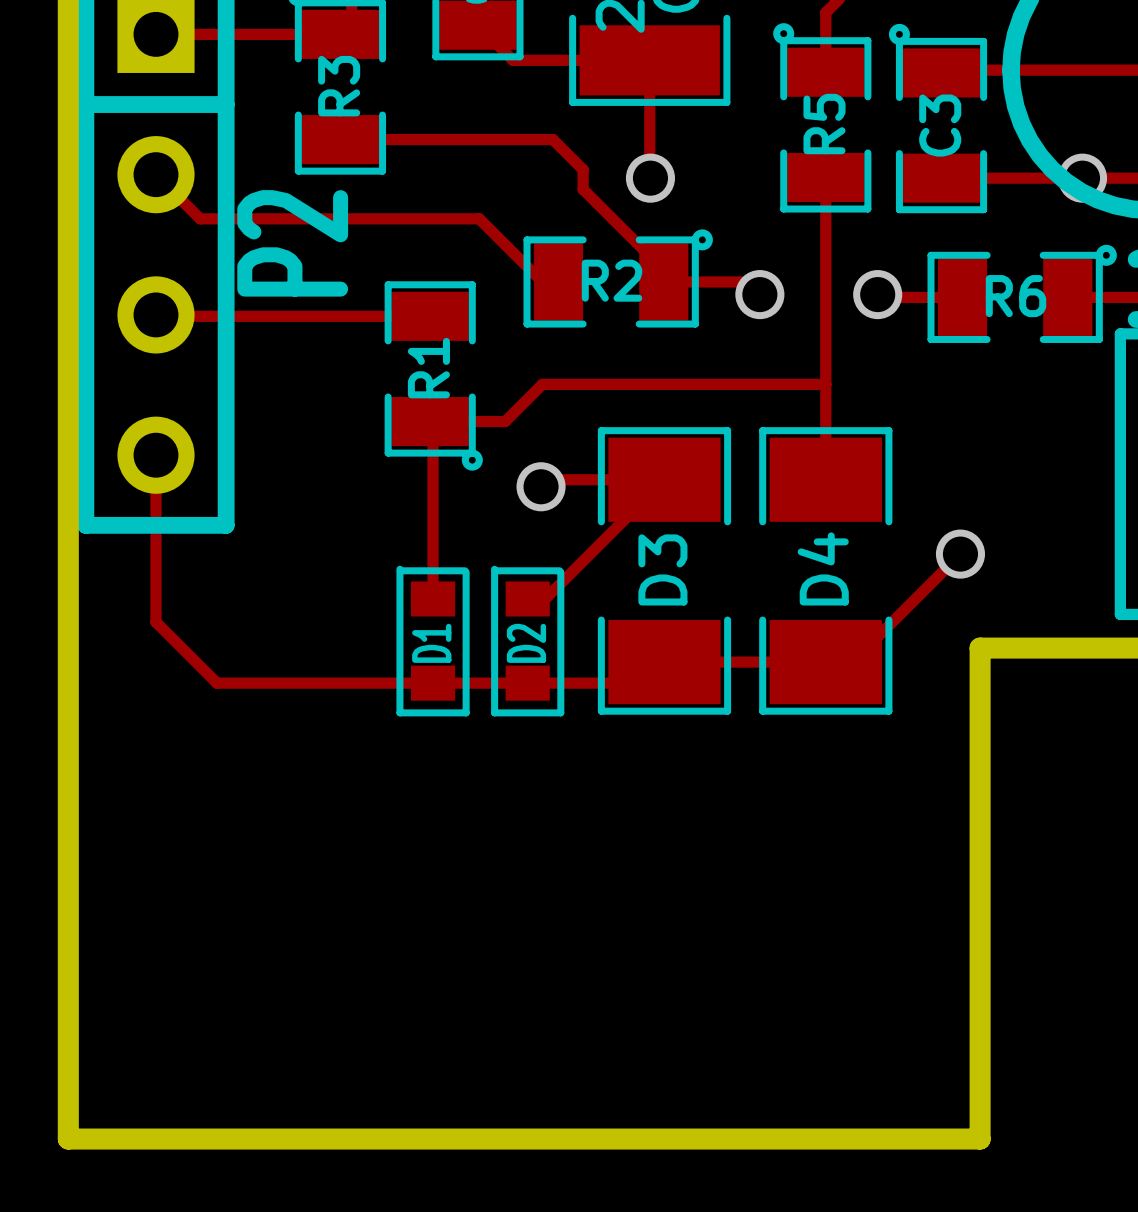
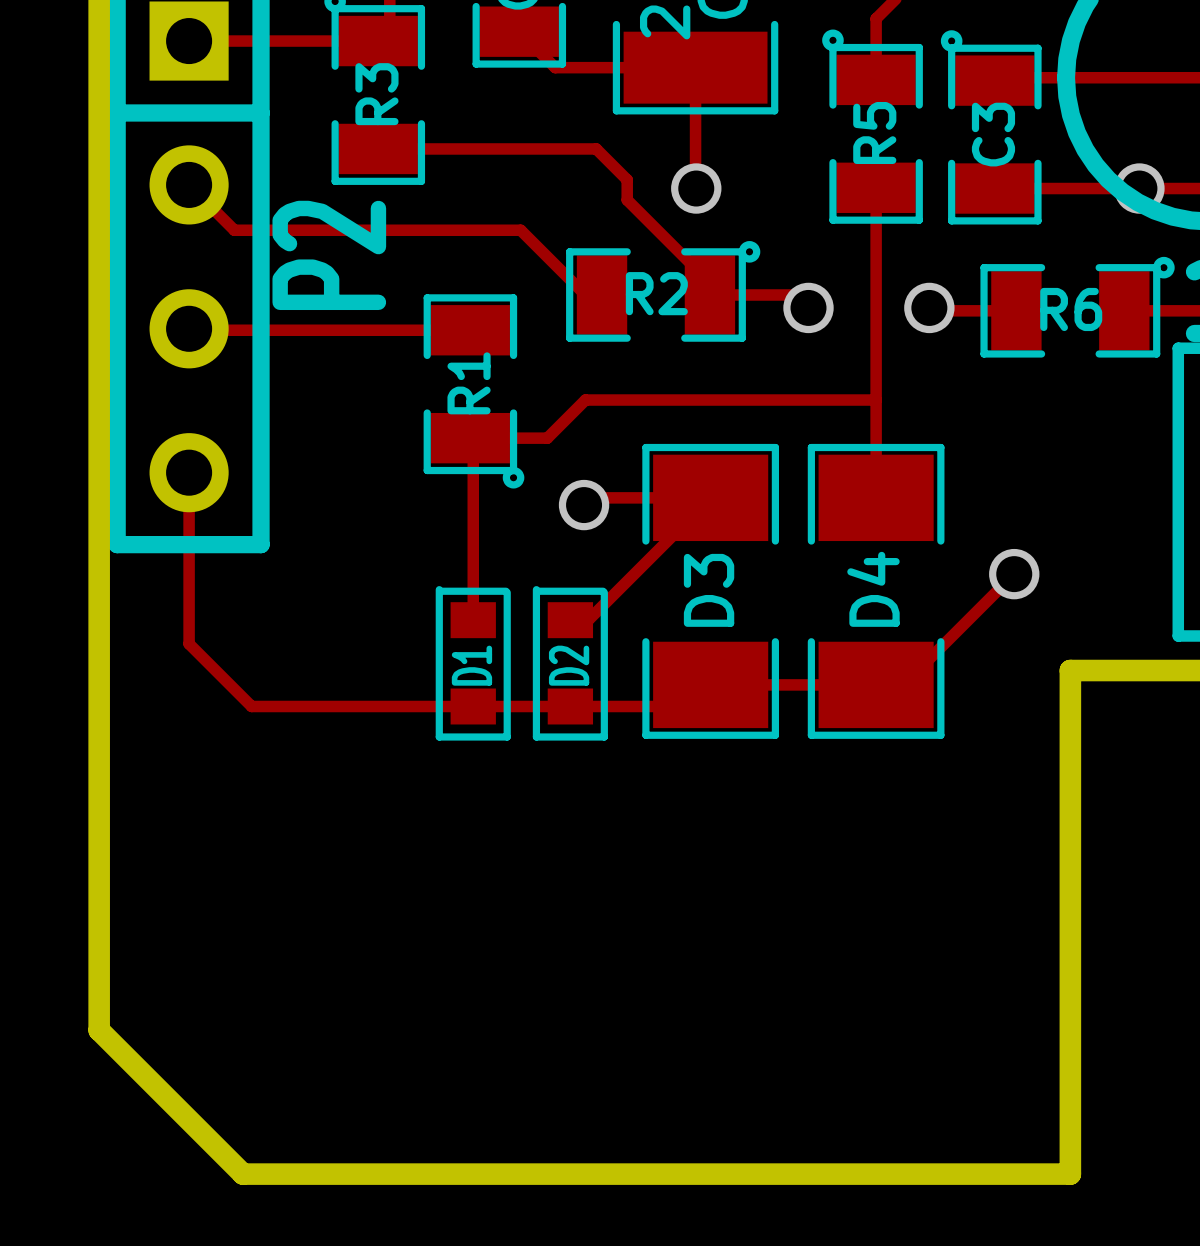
board edge: (1015, 648) (980, 648) (980, 1139) -> (1070, 670) (1070, 1174) (1034, 1174)
board edge: (68, 998) (68, 1139) (208, 1139) -> (99, 1030) (243, 1174)

